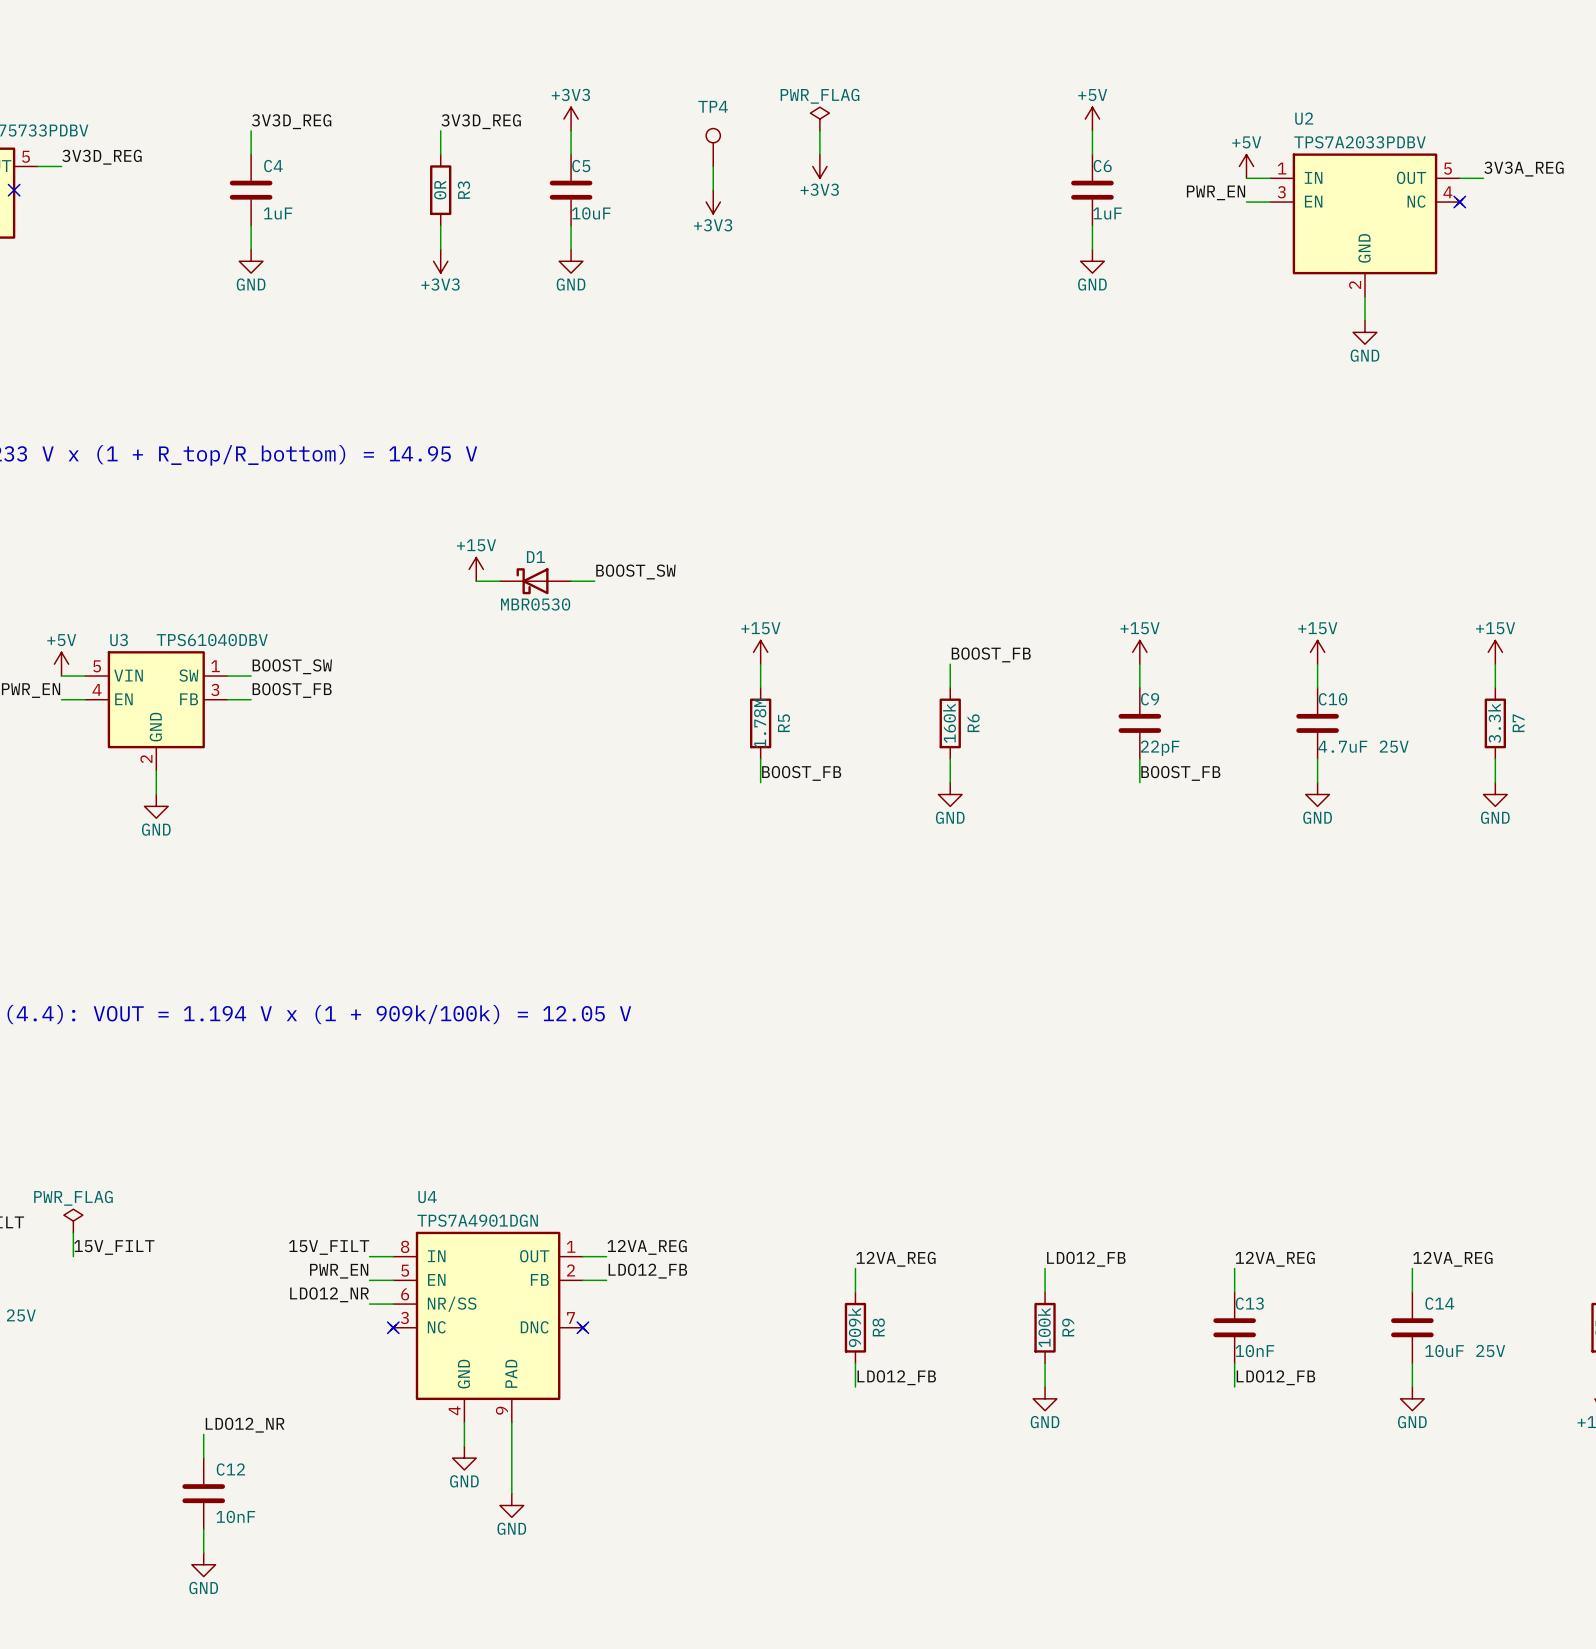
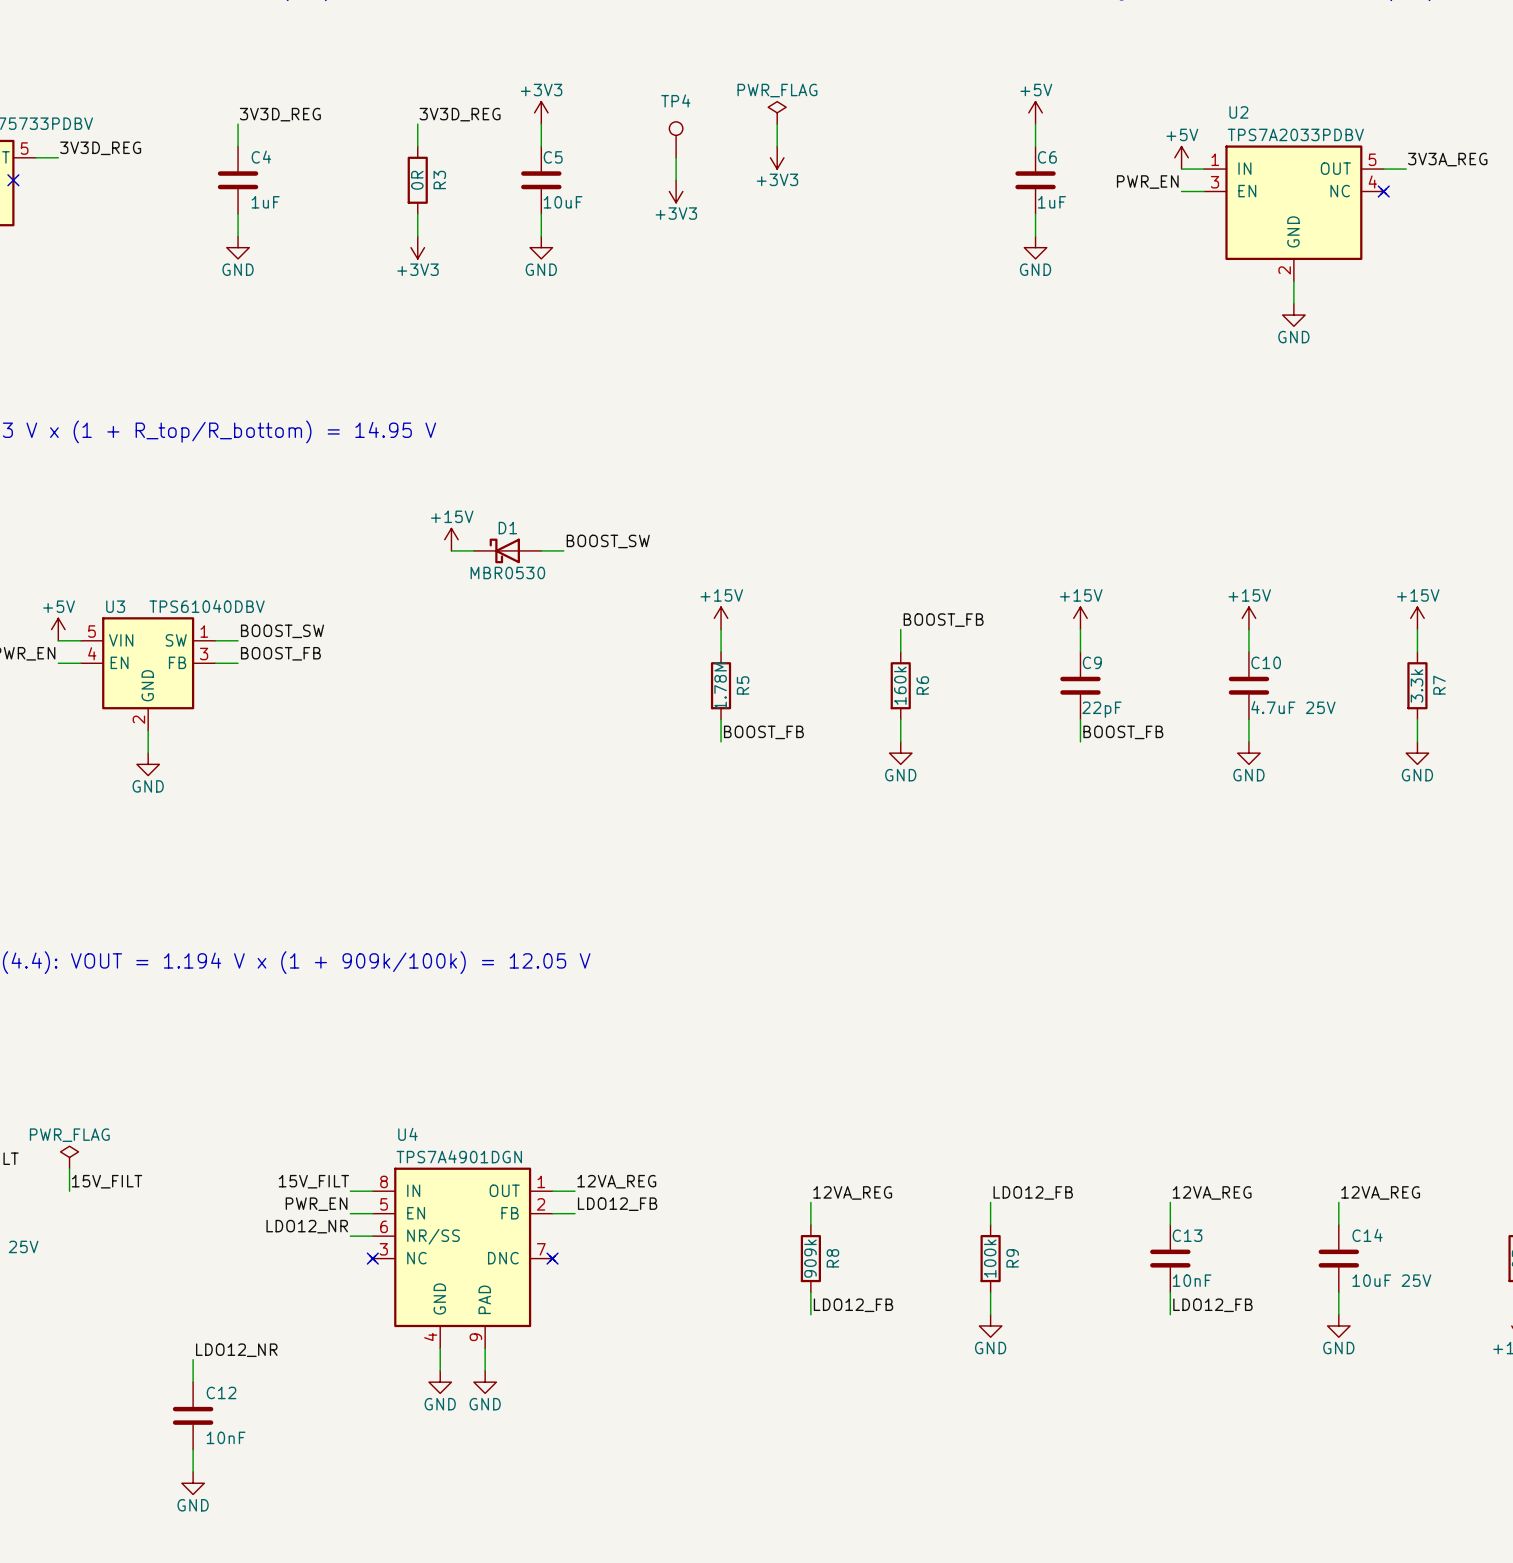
wire: (511, 1446) (511, 1493) -> none
power symbol position: GND (511, 1505) -> GND (485, 1382)

